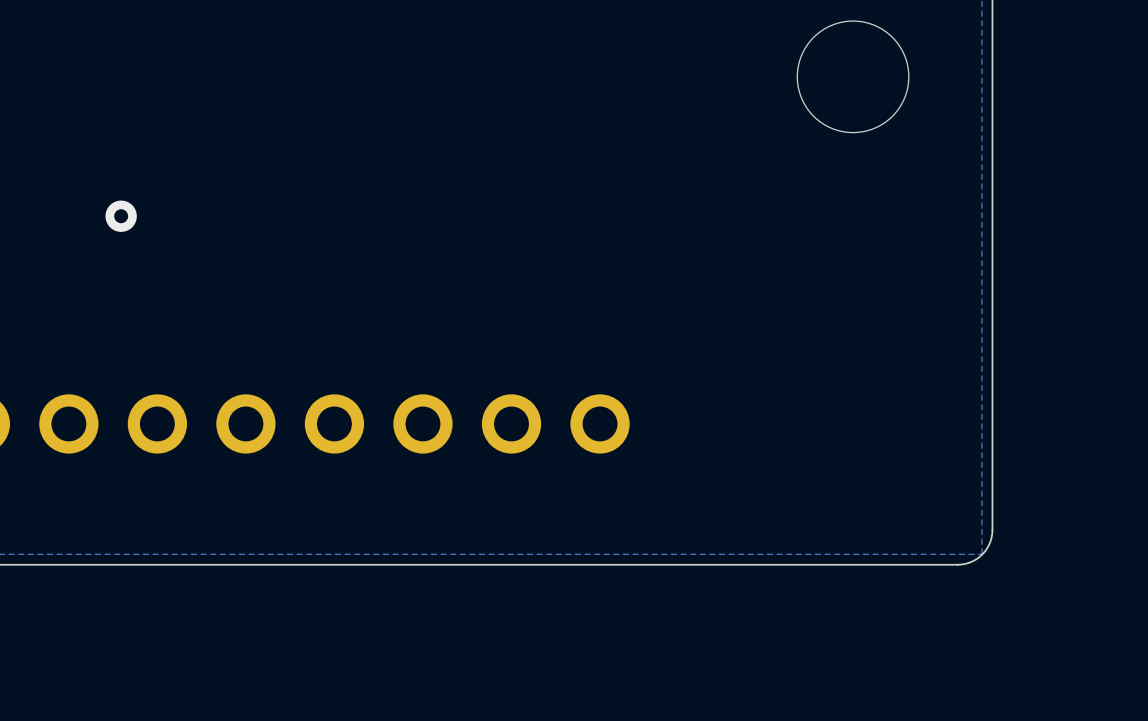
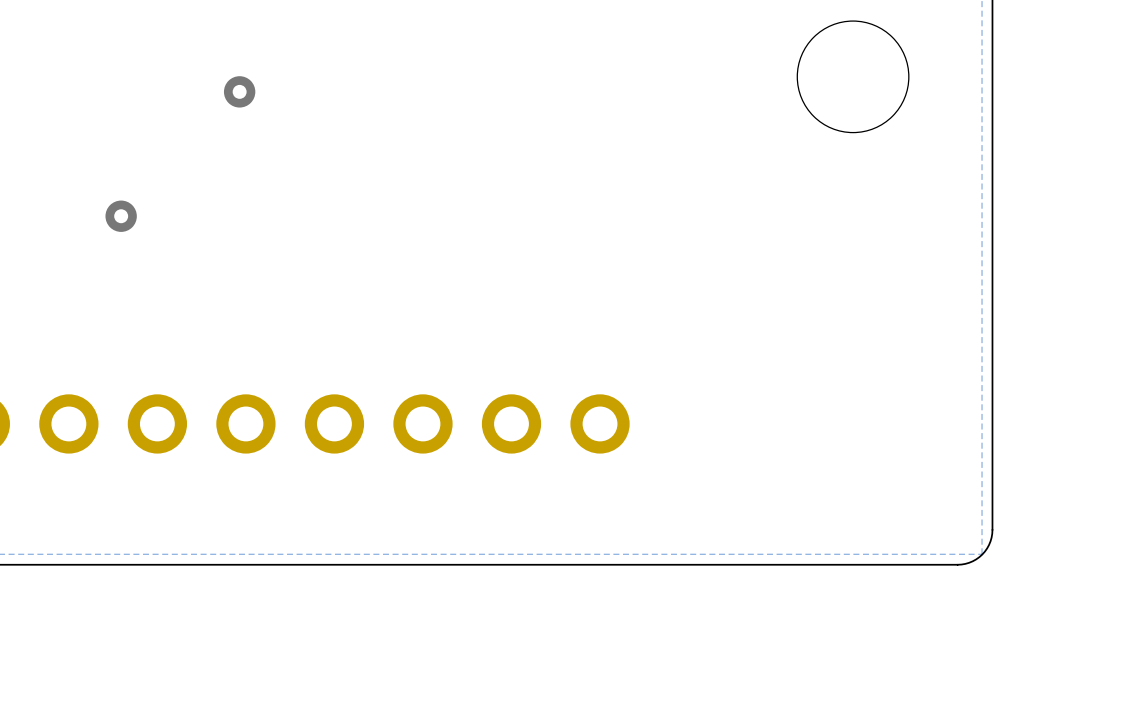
via: none -> (239, 91)

